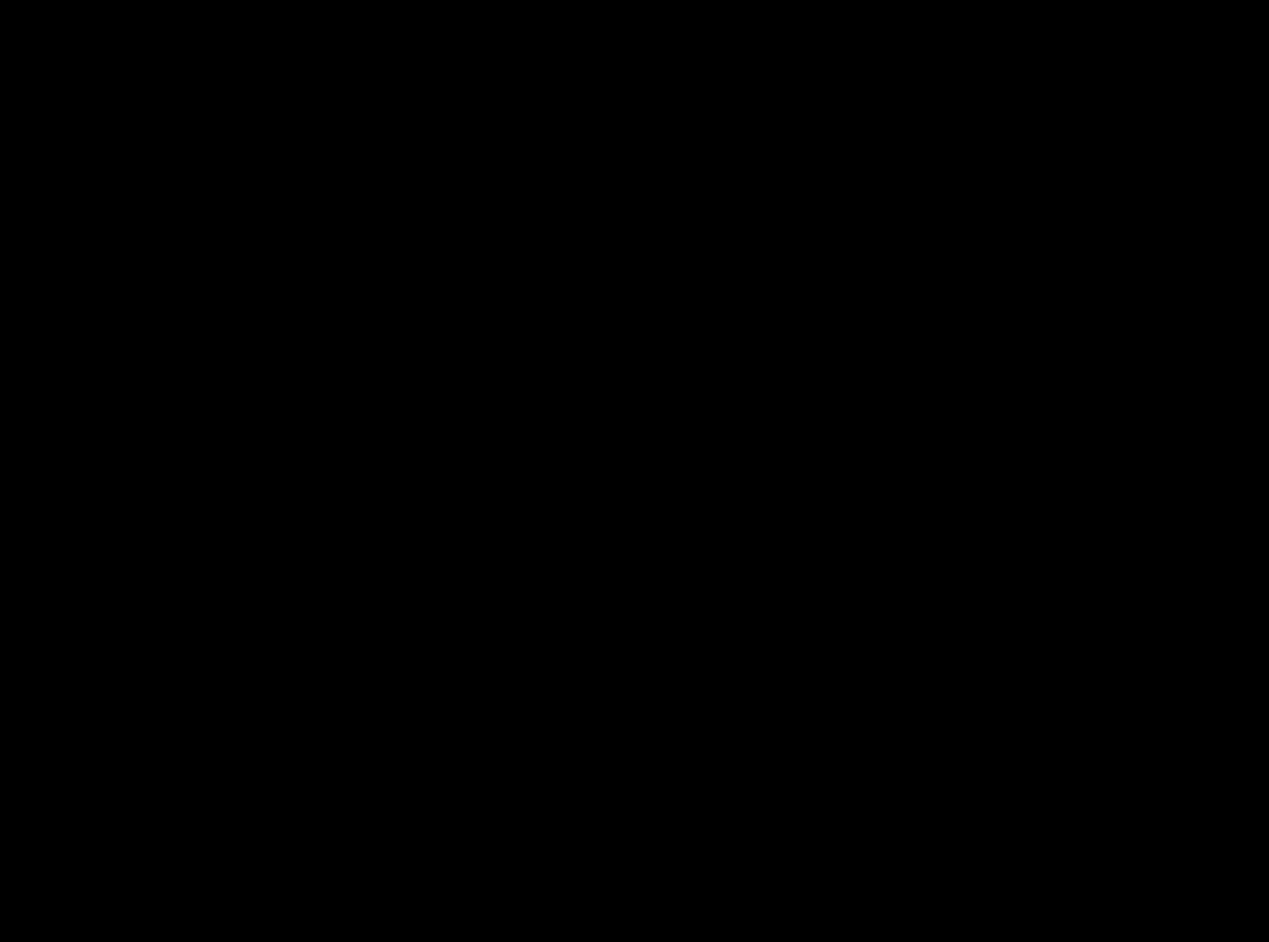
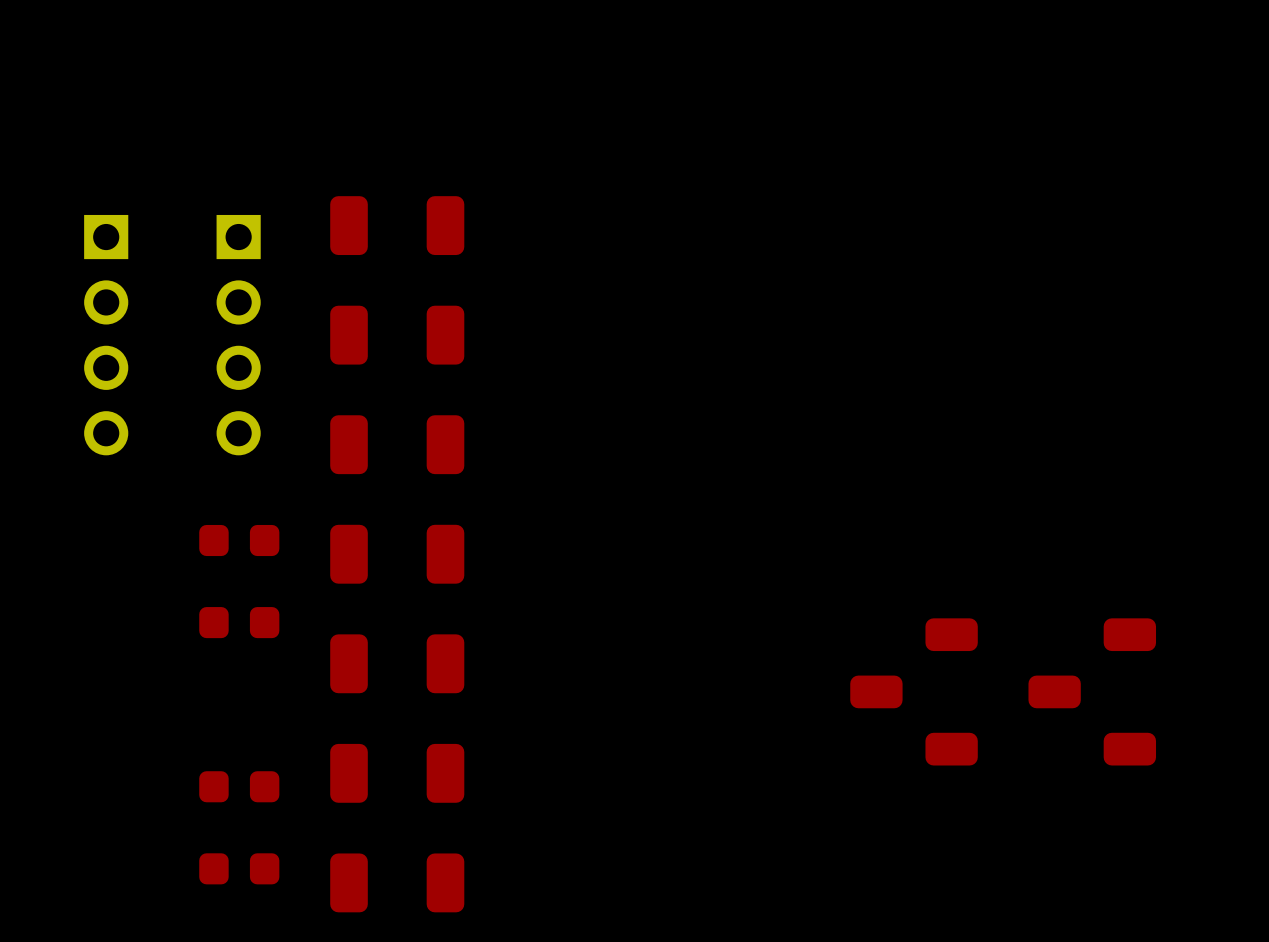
part: none -> (397, 225)
part: none -> (106, 335)
part: none -> (238, 335)
part: none -> (397, 335)
part: none -> (397, 444)
part: none -> (239, 540)
part: none -> (397, 554)
part: none -> (239, 622)
part: none -> (397, 663)
part: none -> (914, 691)
part: none -> (1092, 691)
part: none -> (397, 773)
part: none -> (239, 786)
part: none -> (239, 868)
part: none -> (397, 882)

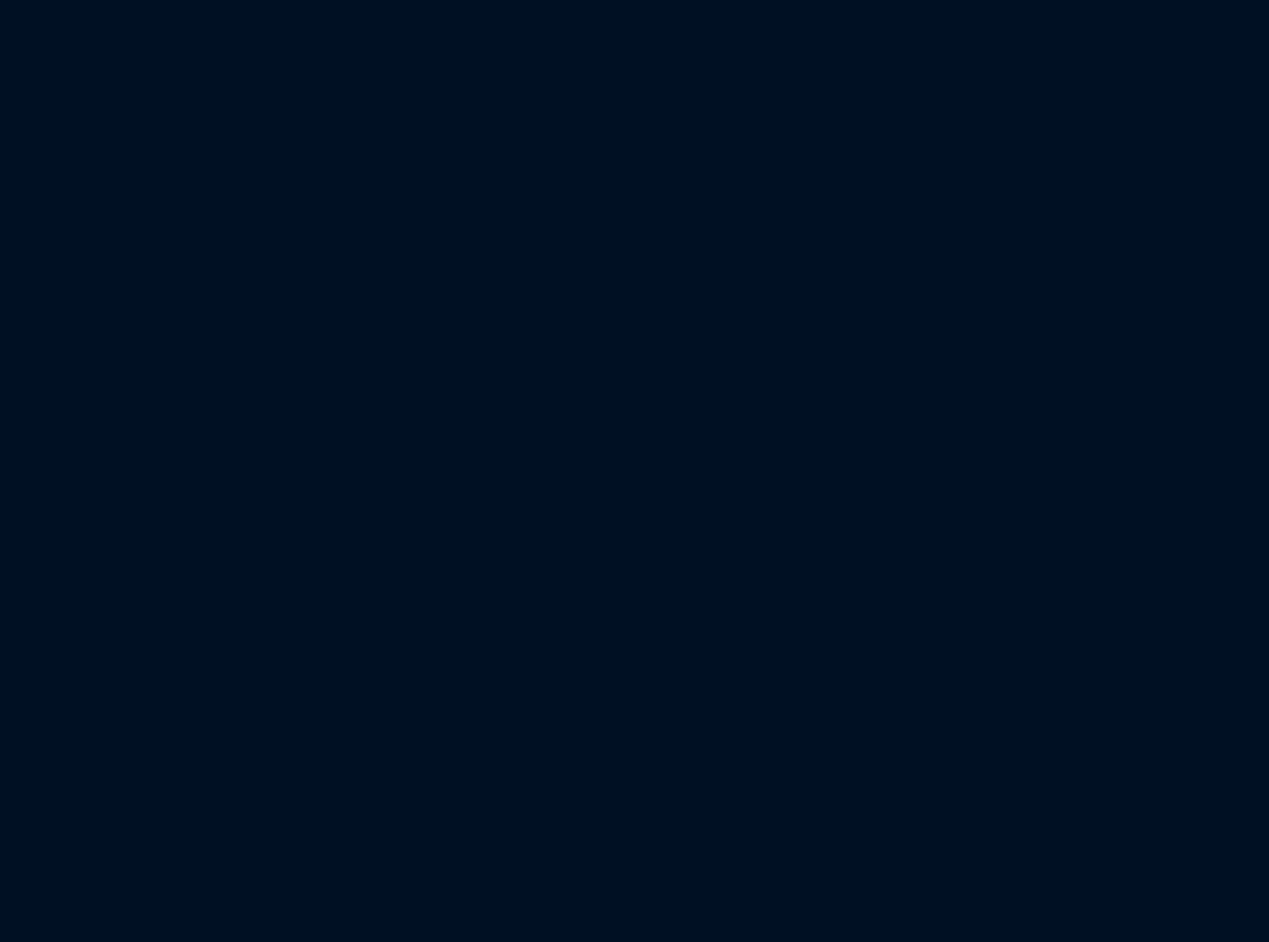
part: (397, 225) -> none
part: (106, 335) -> none
part: (238, 335) -> none
part: (397, 335) -> none
part: (397, 444) -> none
part: (239, 540) -> none
part: (397, 554) -> none
part: (239, 622) -> none
part: (397, 663) -> none
part: (914, 691) -> none
part: (1092, 691) -> none
part: (397, 773) -> none
part: (239, 786) -> none
part: (239, 868) -> none
part: (397, 882) -> none

